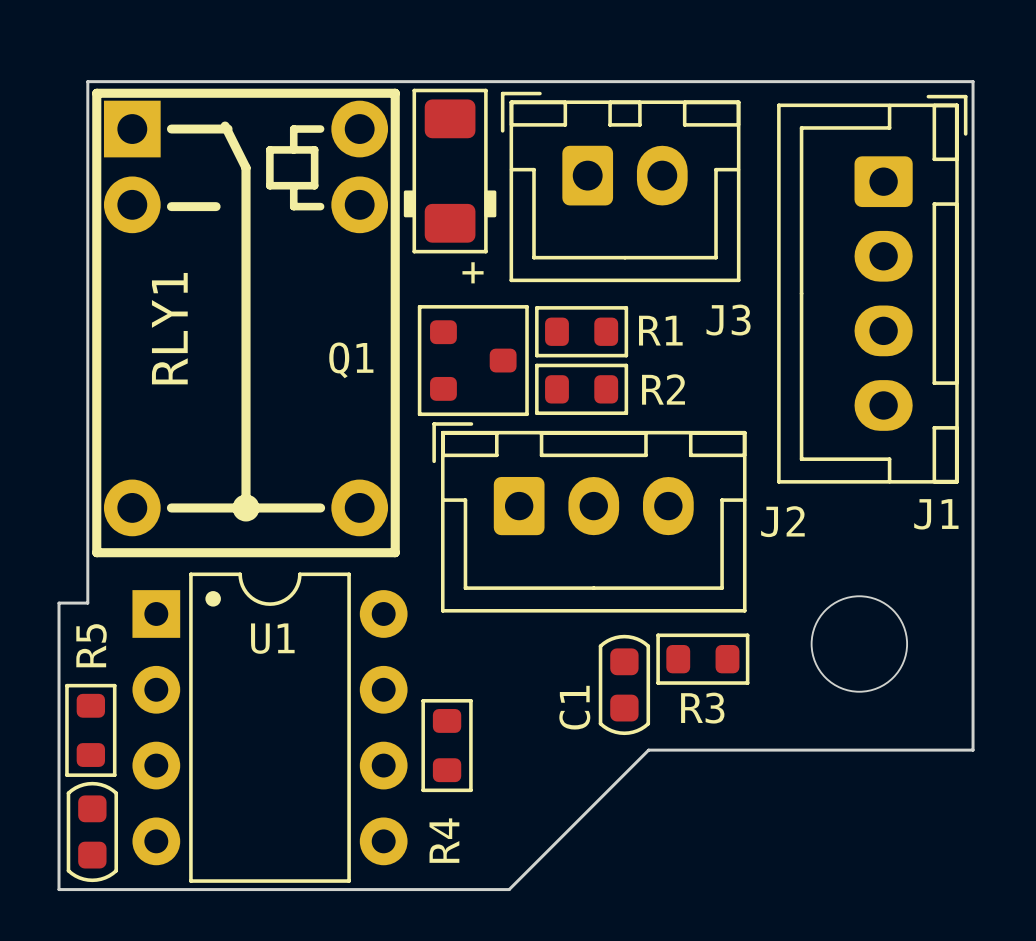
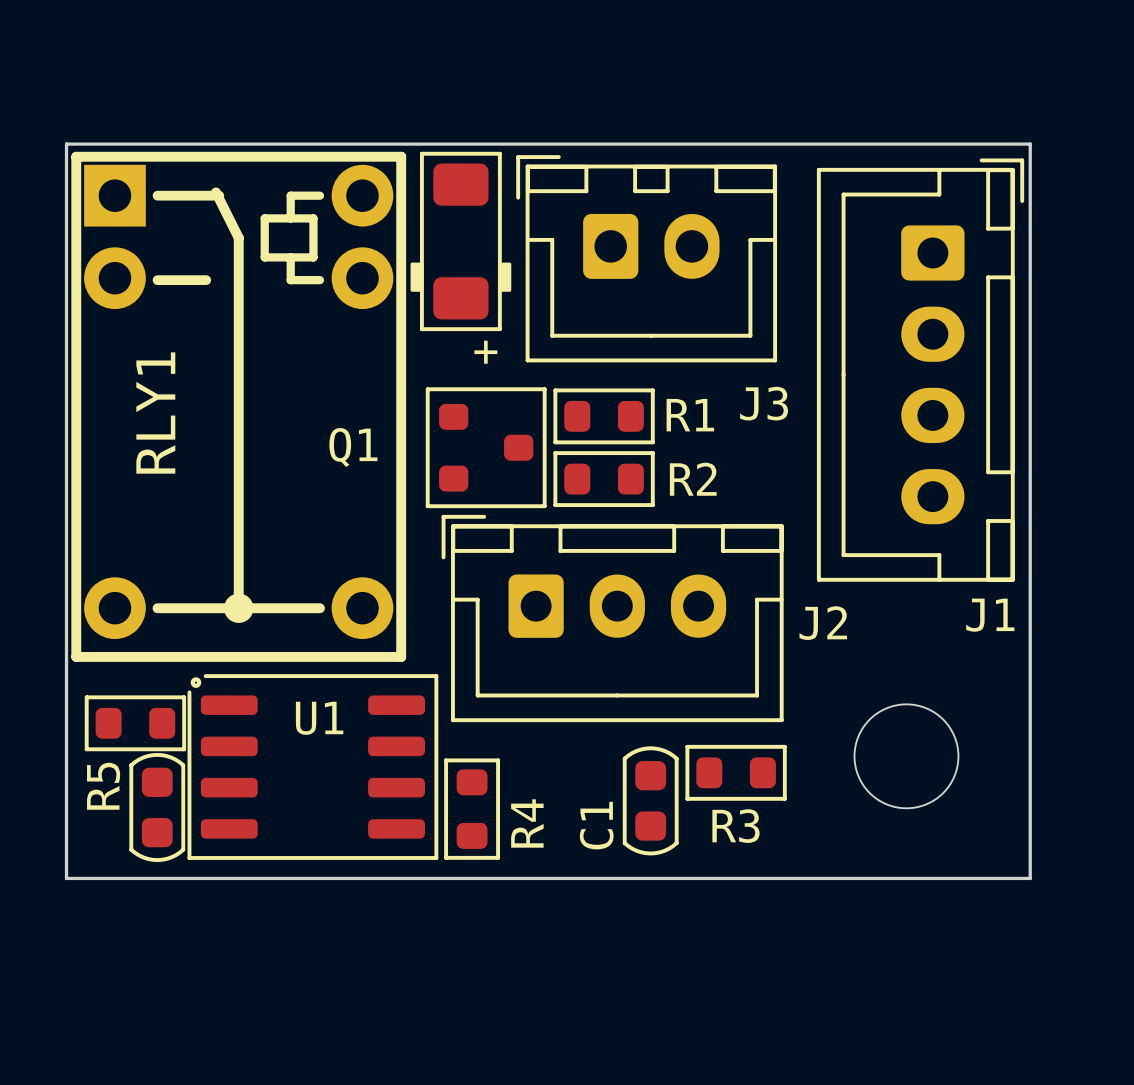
U1 footprint: [132, 572, 408, 883] -> [187, 674, 439, 860]
board edge: (87, 603) (59, 603) (59, 889) (509, 889) (648, 750) (973, 750) -> (66, 711) (66, 878) (1030, 878) (1030, 871)
R5 name position: R5 (91, 645) -> R5 (103, 786)
R5 rotation: 0° (90, 730) -> 90° clockwise (135, 723)
R5 position: (90, 730) -> (135, 723)
R4 position: (447, 745) -> (472, 809)
part position: (92, 831) -> (157, 807)
R4 name position: R4 (444, 840) -> R4 (527, 823)

